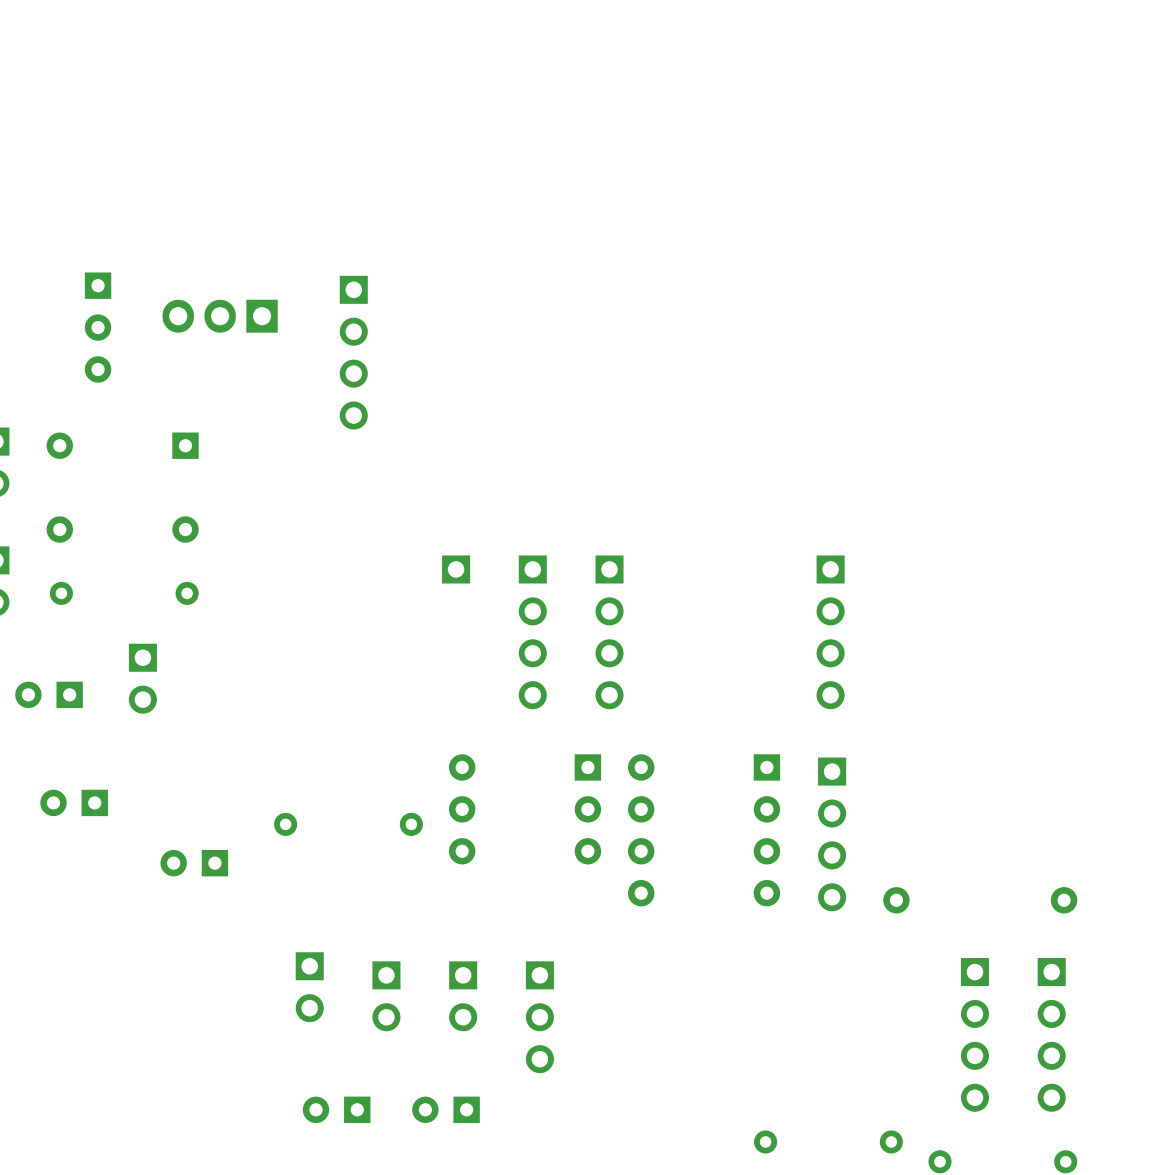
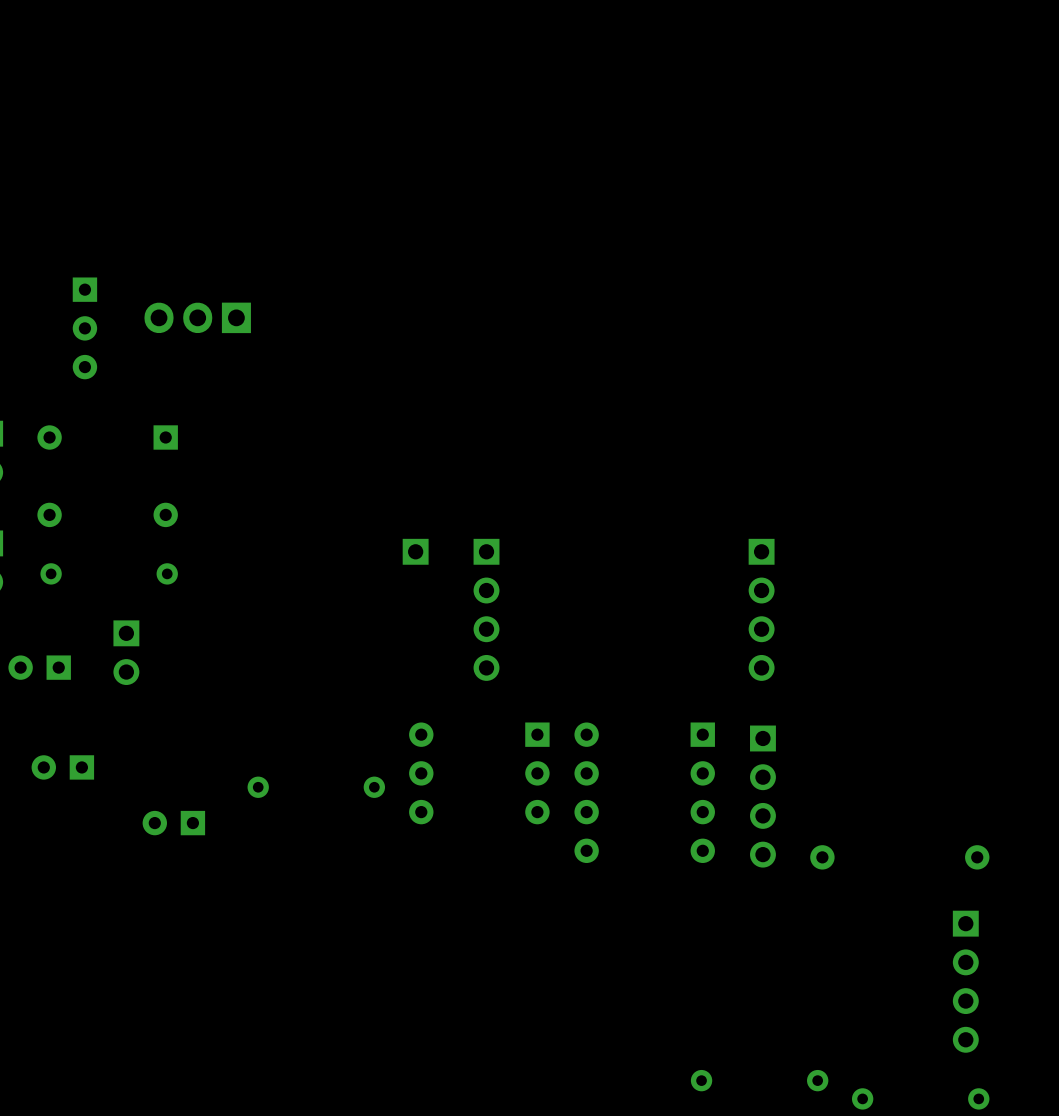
part: (353, 352) -> none
part: (609, 632) -> none
part: (309, 987) -> none
part: (386, 996) -> none
part: (463, 996) -> none
part: (539, 1017) -> none
part: (974, 1034) -> none
part: (336, 1109) -> none
part: (446, 1109) -> none

